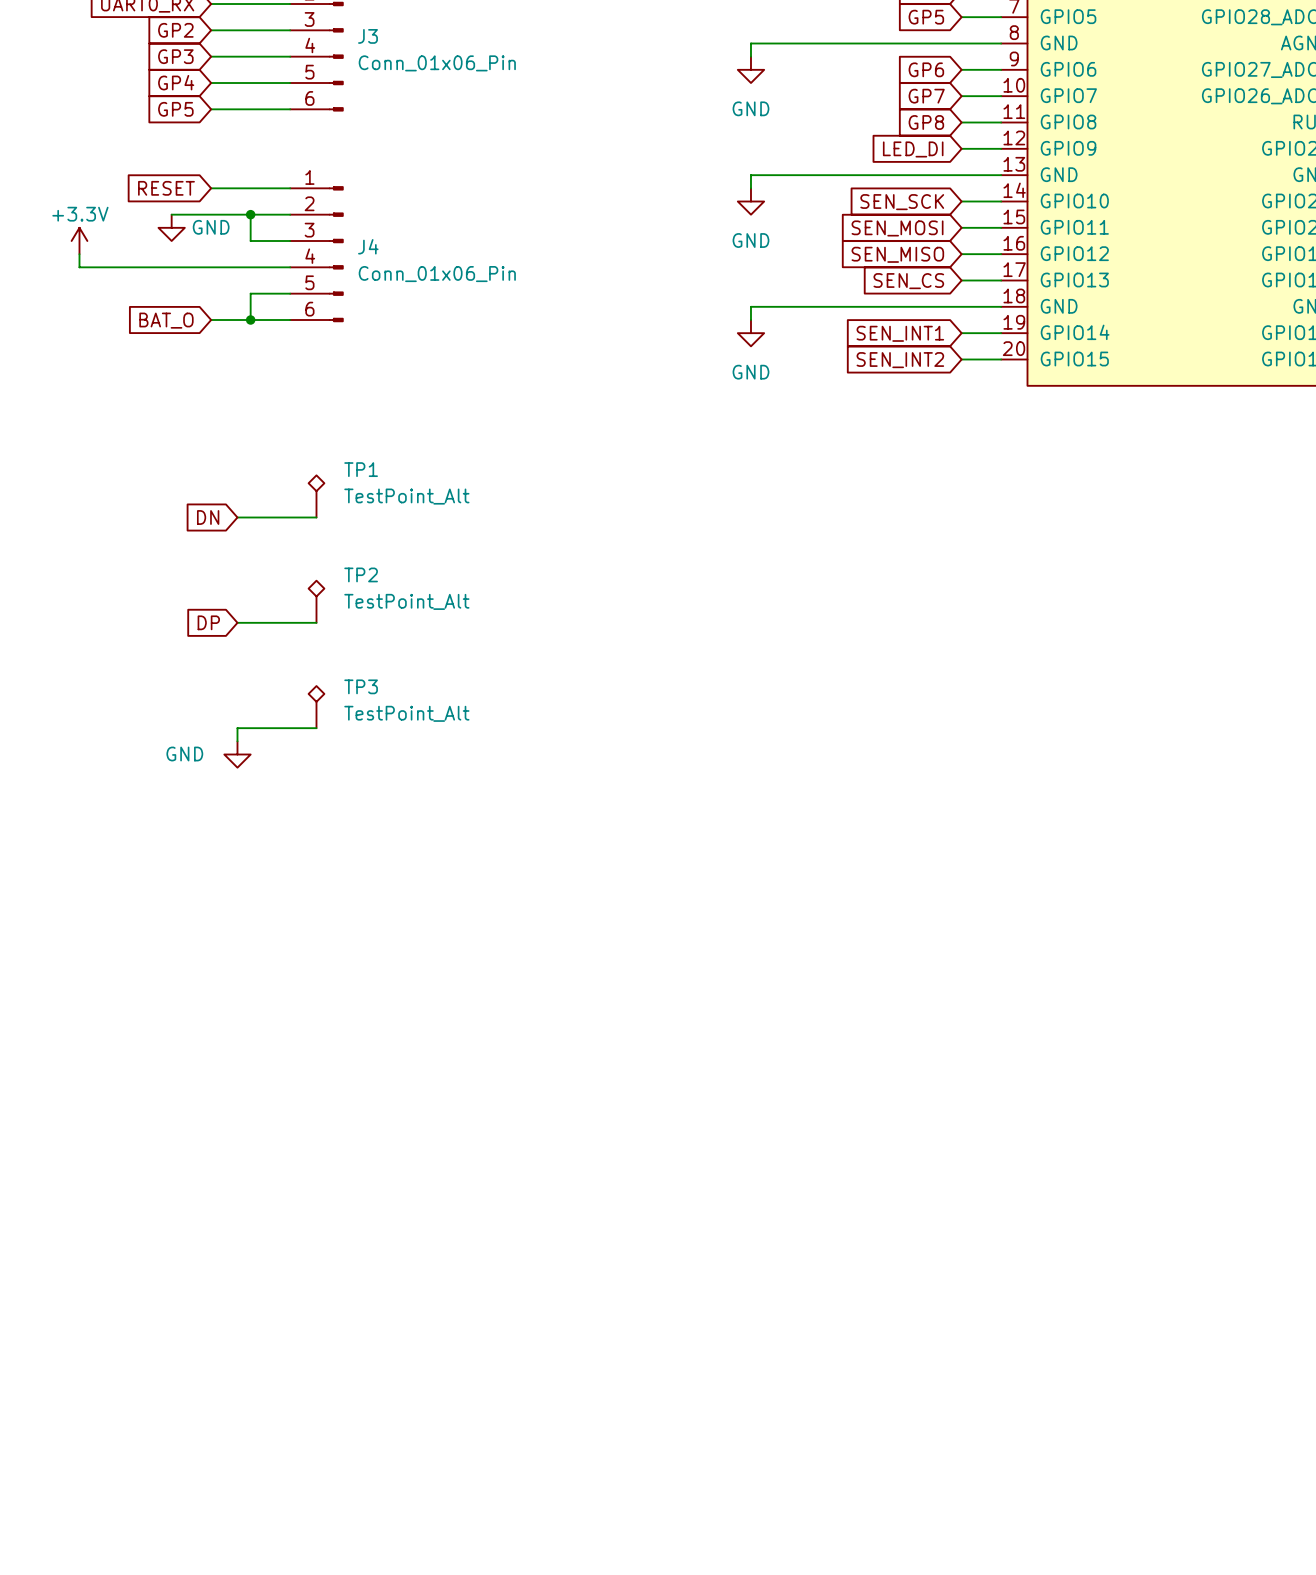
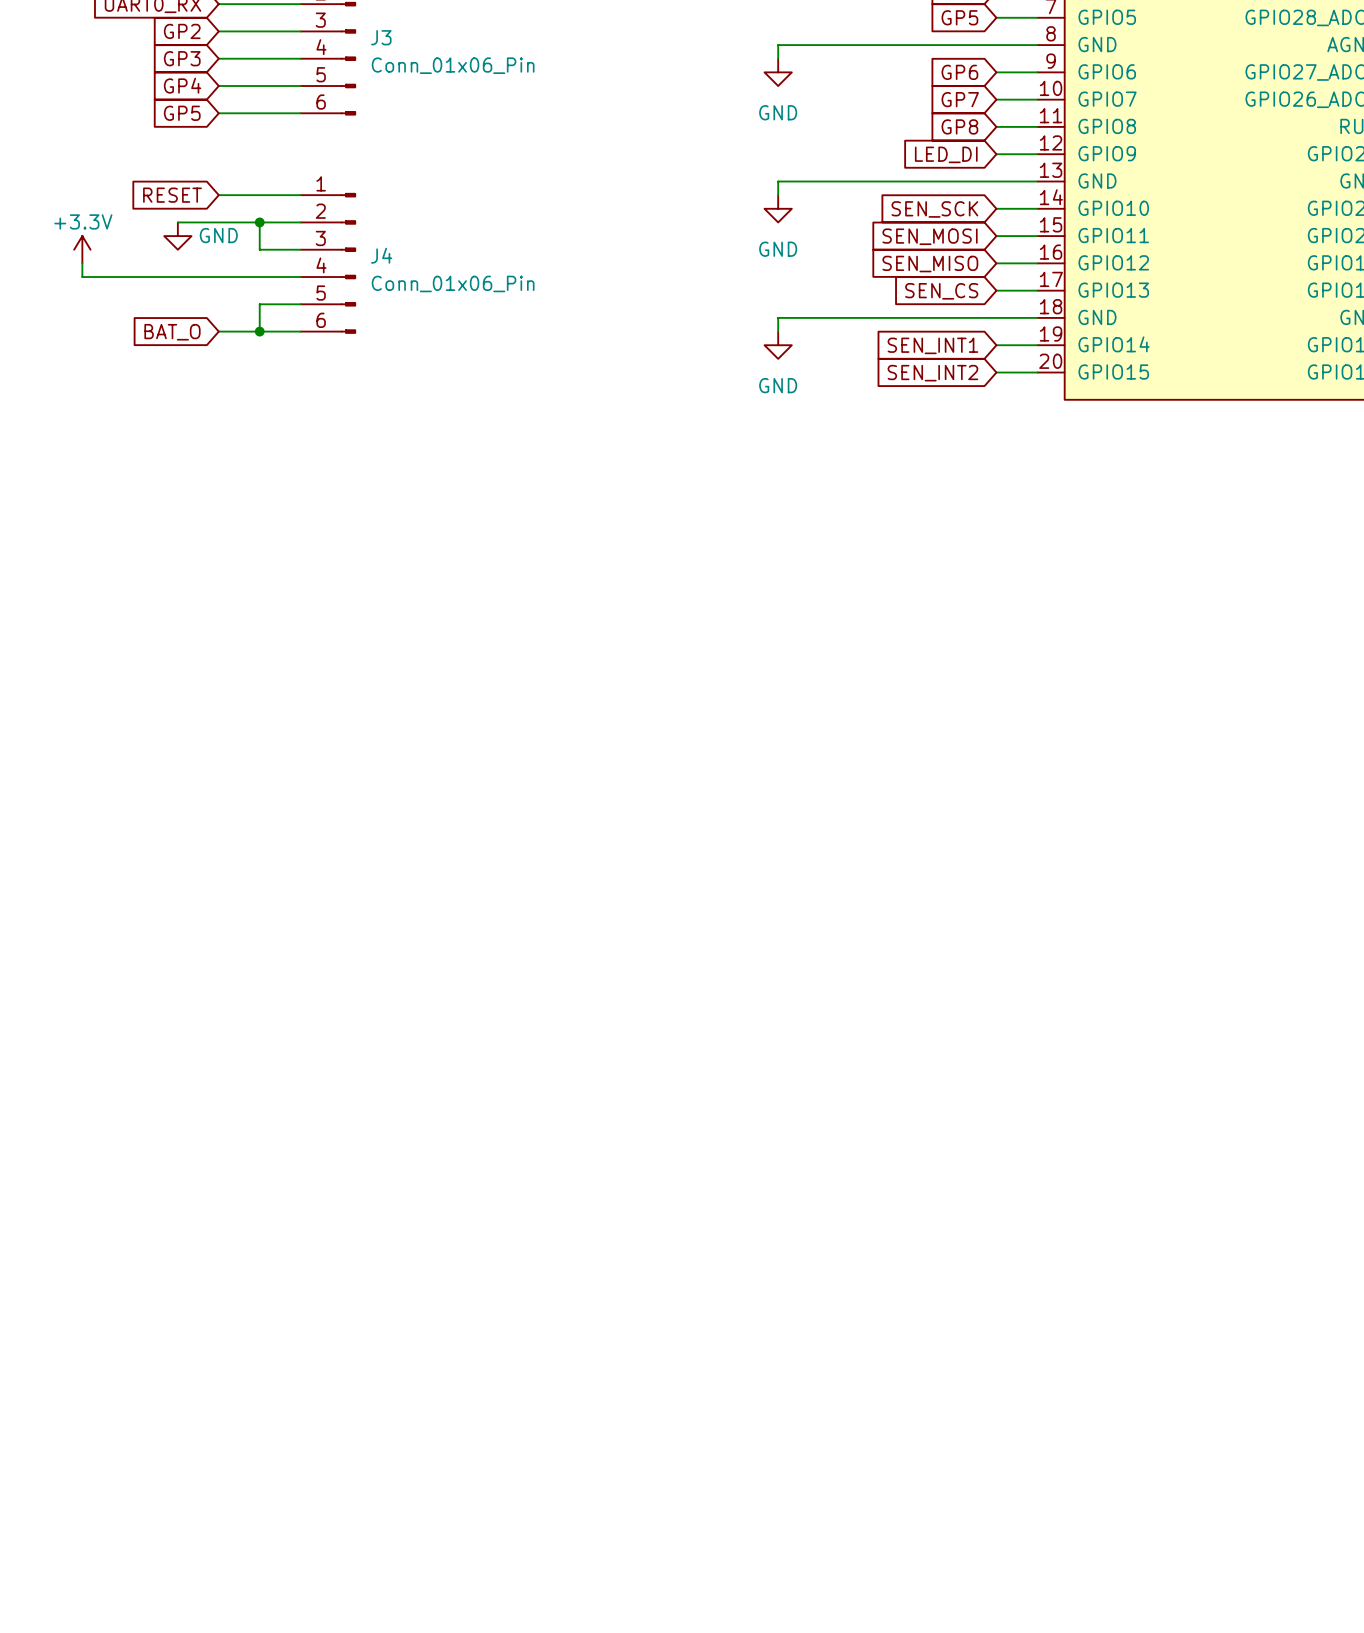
TP1: TestPoint_Alt (316, 496) -> none
global label: DN (208, 517) -> none
wire: (237, 517) (316, 517) -> none
TP2: TestPoint_Alt (316, 601) -> none
global label: DP (208, 622) -> none
wire: (237, 622) (316, 622) -> none
TP3: TestPoint_Alt (316, 707) -> none
wire: (316, 728) (237, 728) (237, 741) -> none
power symbol: GND (237, 754) -> none

